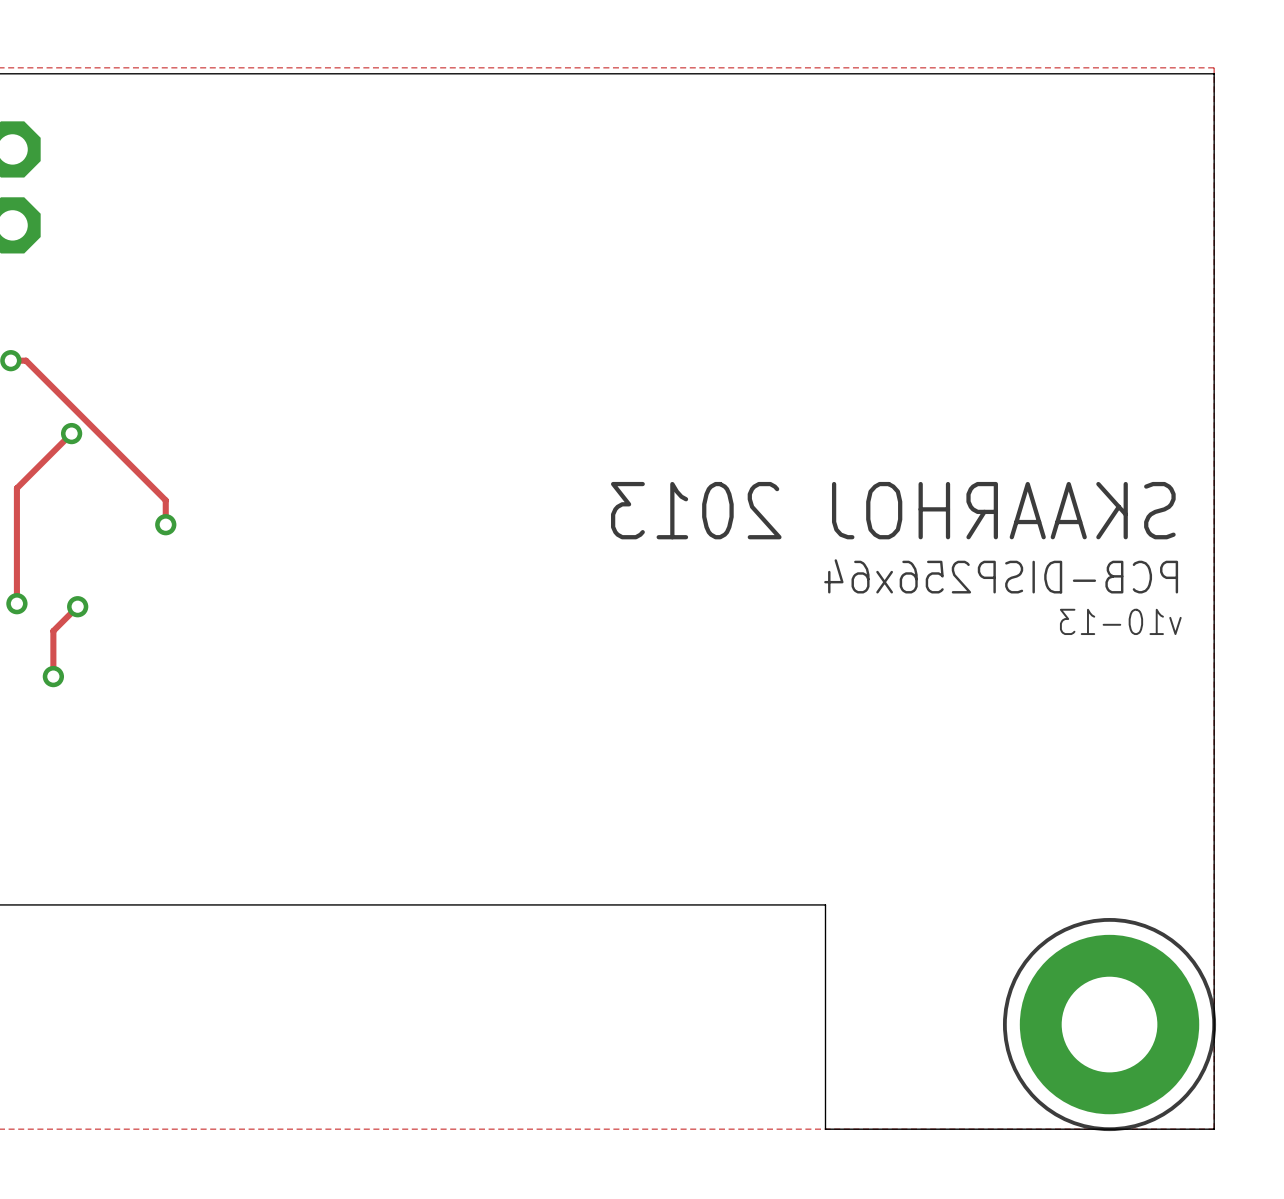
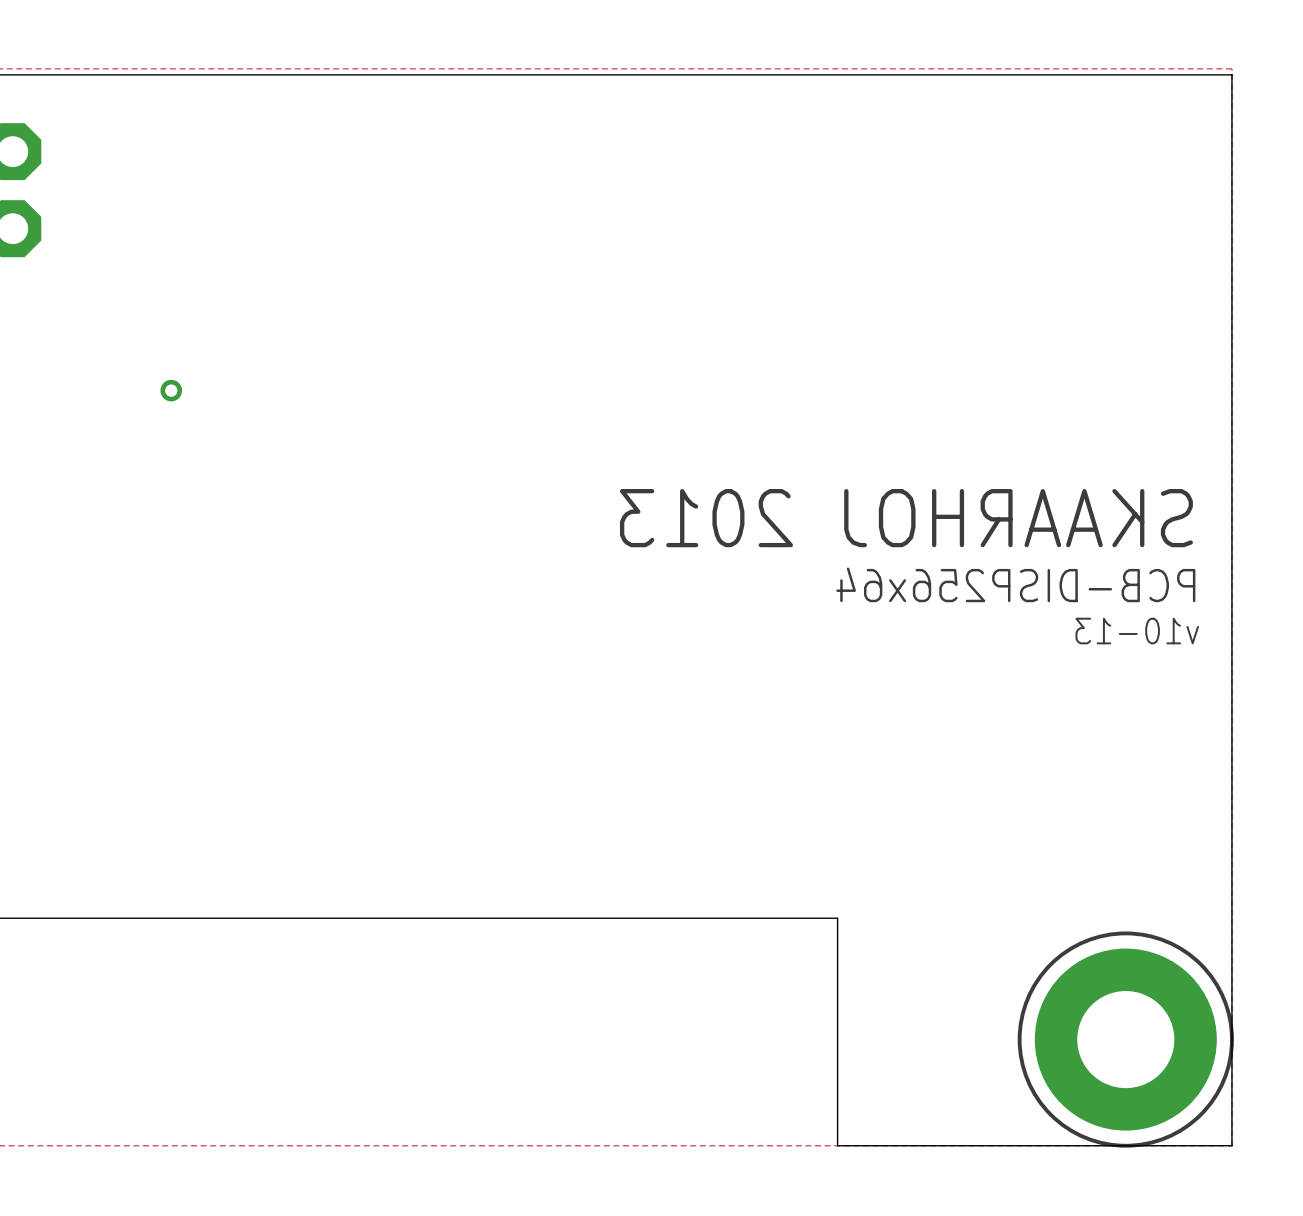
track: (10, 360) (26, 360) (165, 500) (165, 524) -> none
via: (10, 360) -> none
via: none -> (171, 390)
track: (71, 433) (16, 488) (16, 603) -> none
via: (71, 433) -> none
via: (165, 524) -> none
via: (16, 603) -> none
track: (77, 606) (53, 631) (53, 676) -> none
via: (77, 606) -> none
via: (53, 676) -> none

